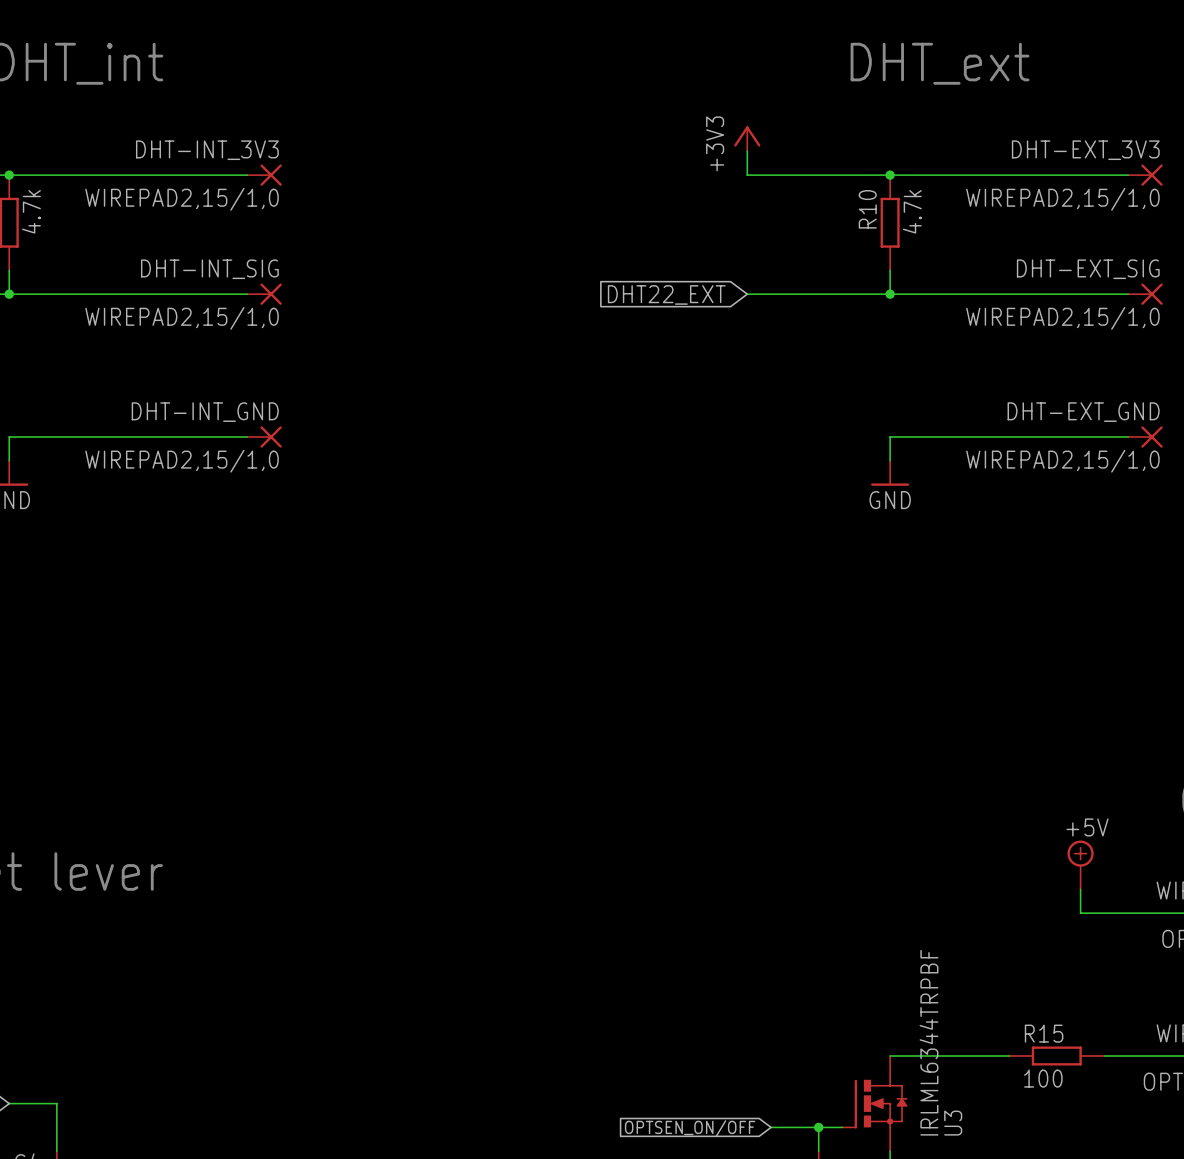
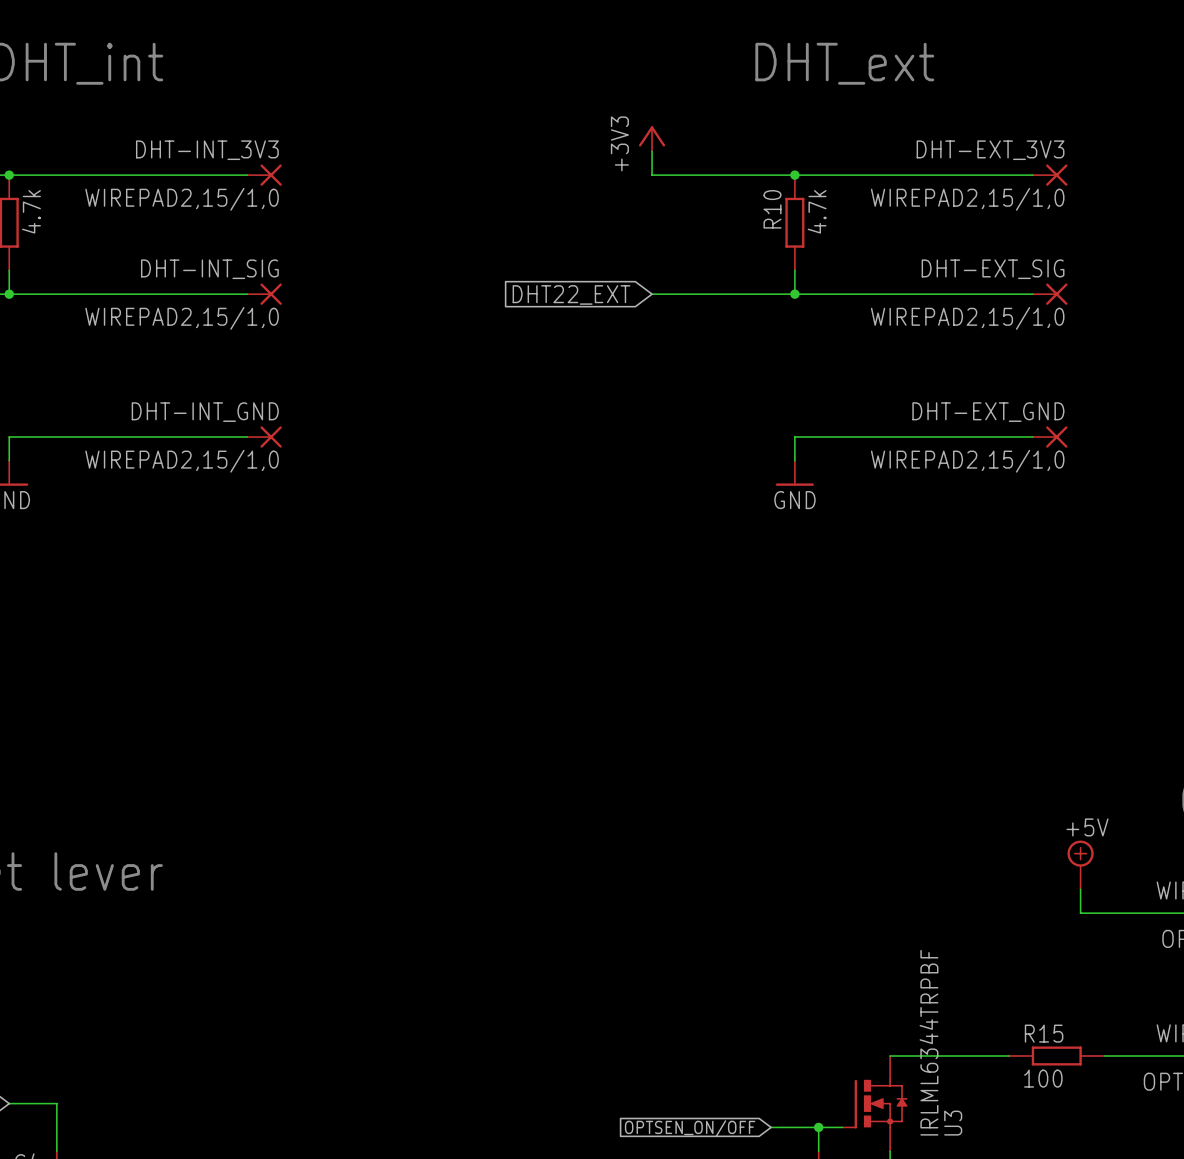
text position: DHT_ext (940, 63) -> DHT_ext (844, 63)
power symbol position: +3V3 (747, 138) -> +3V3 (652, 138)
wire: (747, 151) (747, 175) -> (652, 151) (652, 175) (747, 175)
junction: none -> (794, 175)
junction: (890, 175) -> none
wire: (1032, 175) (1128, 175) -> none
DHT-EXT_3V3 position: (1145, 175) -> (1050, 175)
R10 position: (890, 222) -> (794, 222)
wire: (890, 270) (890, 294) -> (794, 270) (794, 294)
wire: none -> (652, 294) (747, 294)
global label position: DHT22_EXT (666, 294) -> DHT22_EXT (571, 294)
junction: none -> (794, 294)
junction: (890, 294) -> none
wire: (1032, 294) (1128, 294) -> none
DHT-EXT_SIG position: (1145, 294) -> (1050, 294)
wire: (890, 437) (890, 460) -> (890, 437) (794, 437) (794, 460)
wire: (1032, 437) (1128, 437) -> none
DHT-EXT_GND position: (1145, 437) -> (1050, 437)
power symbol position: GND (890, 473) -> GND (794, 473)

